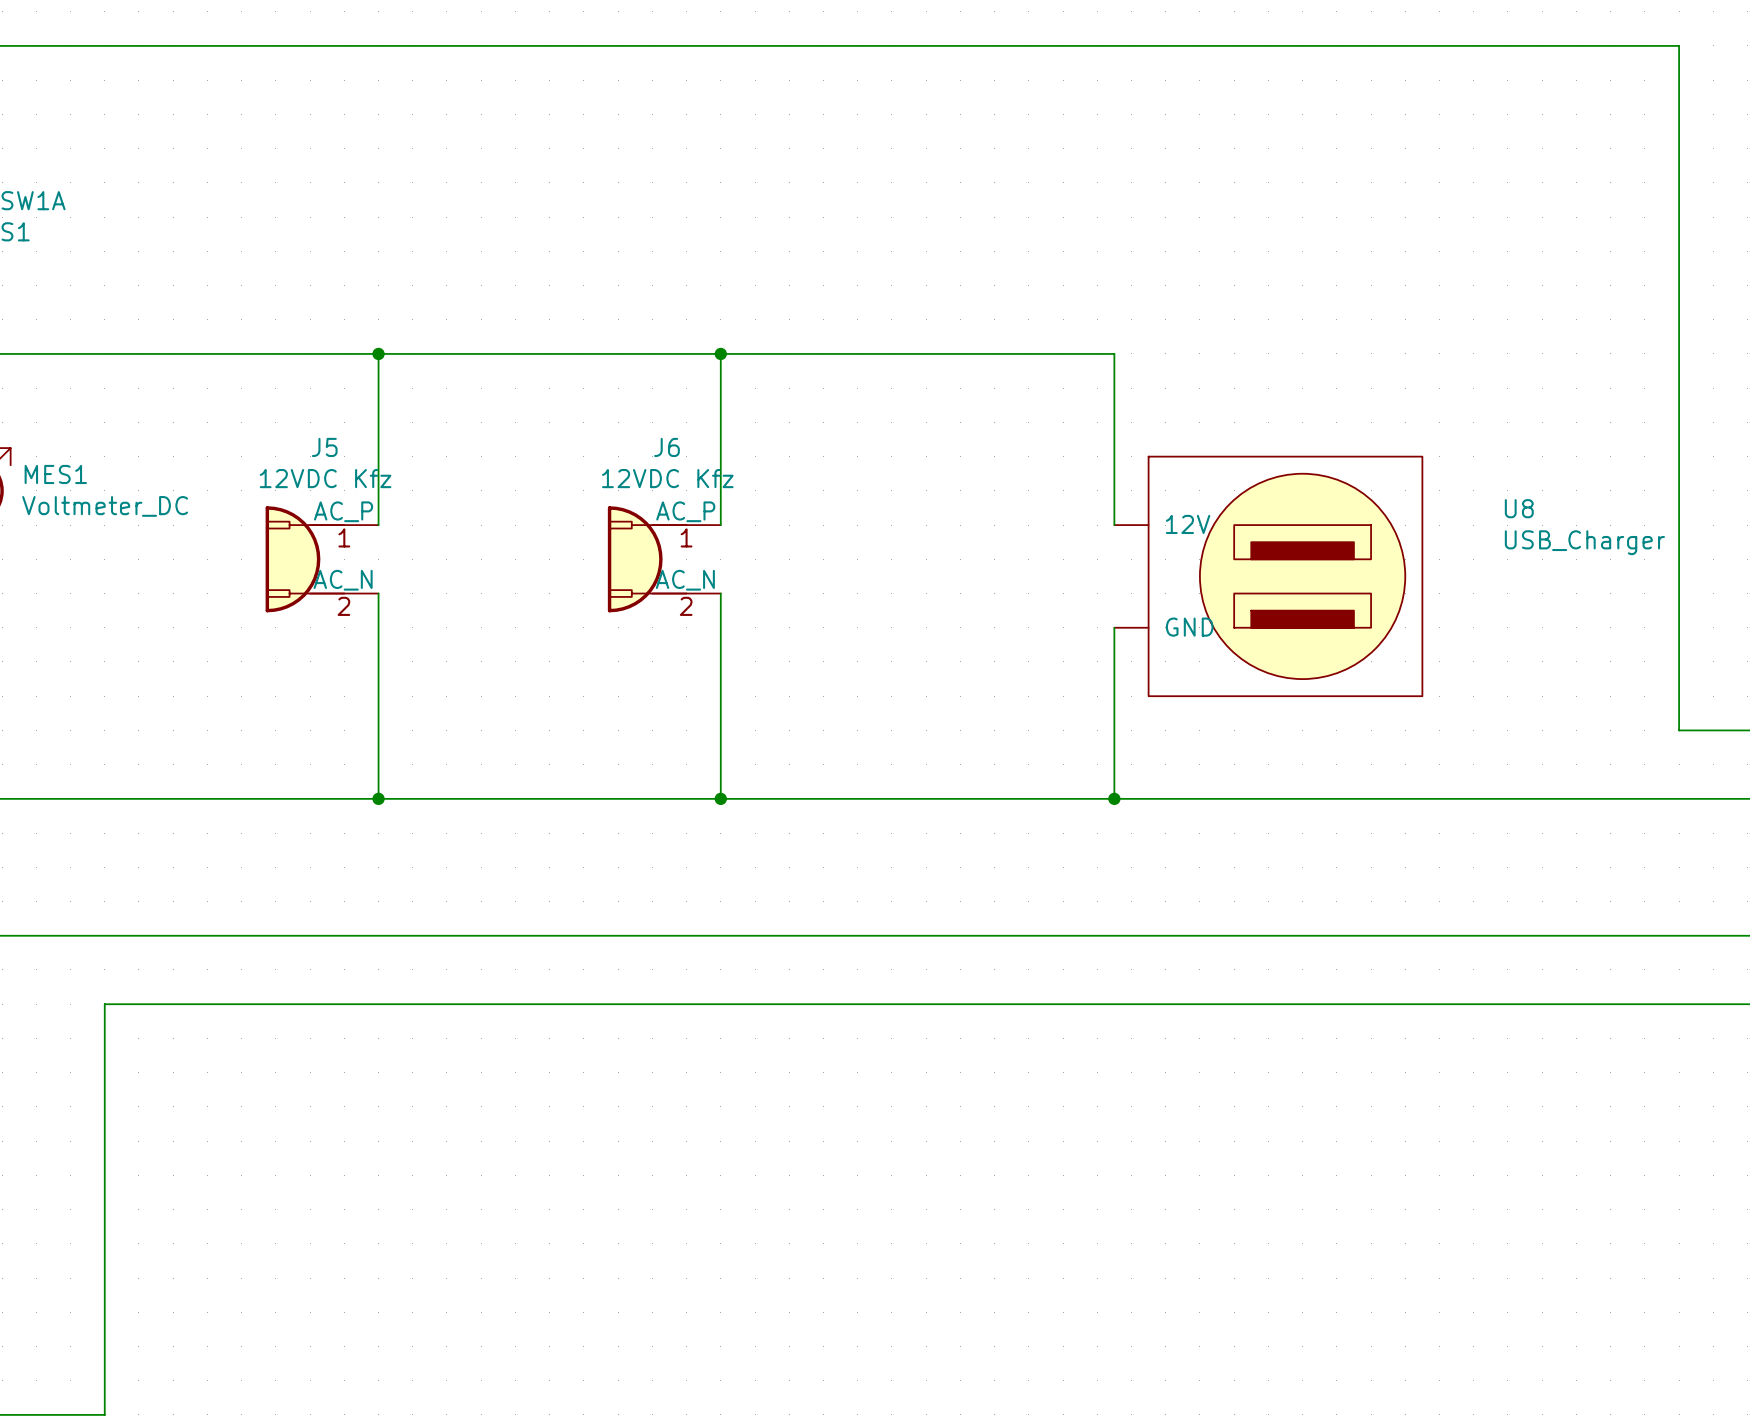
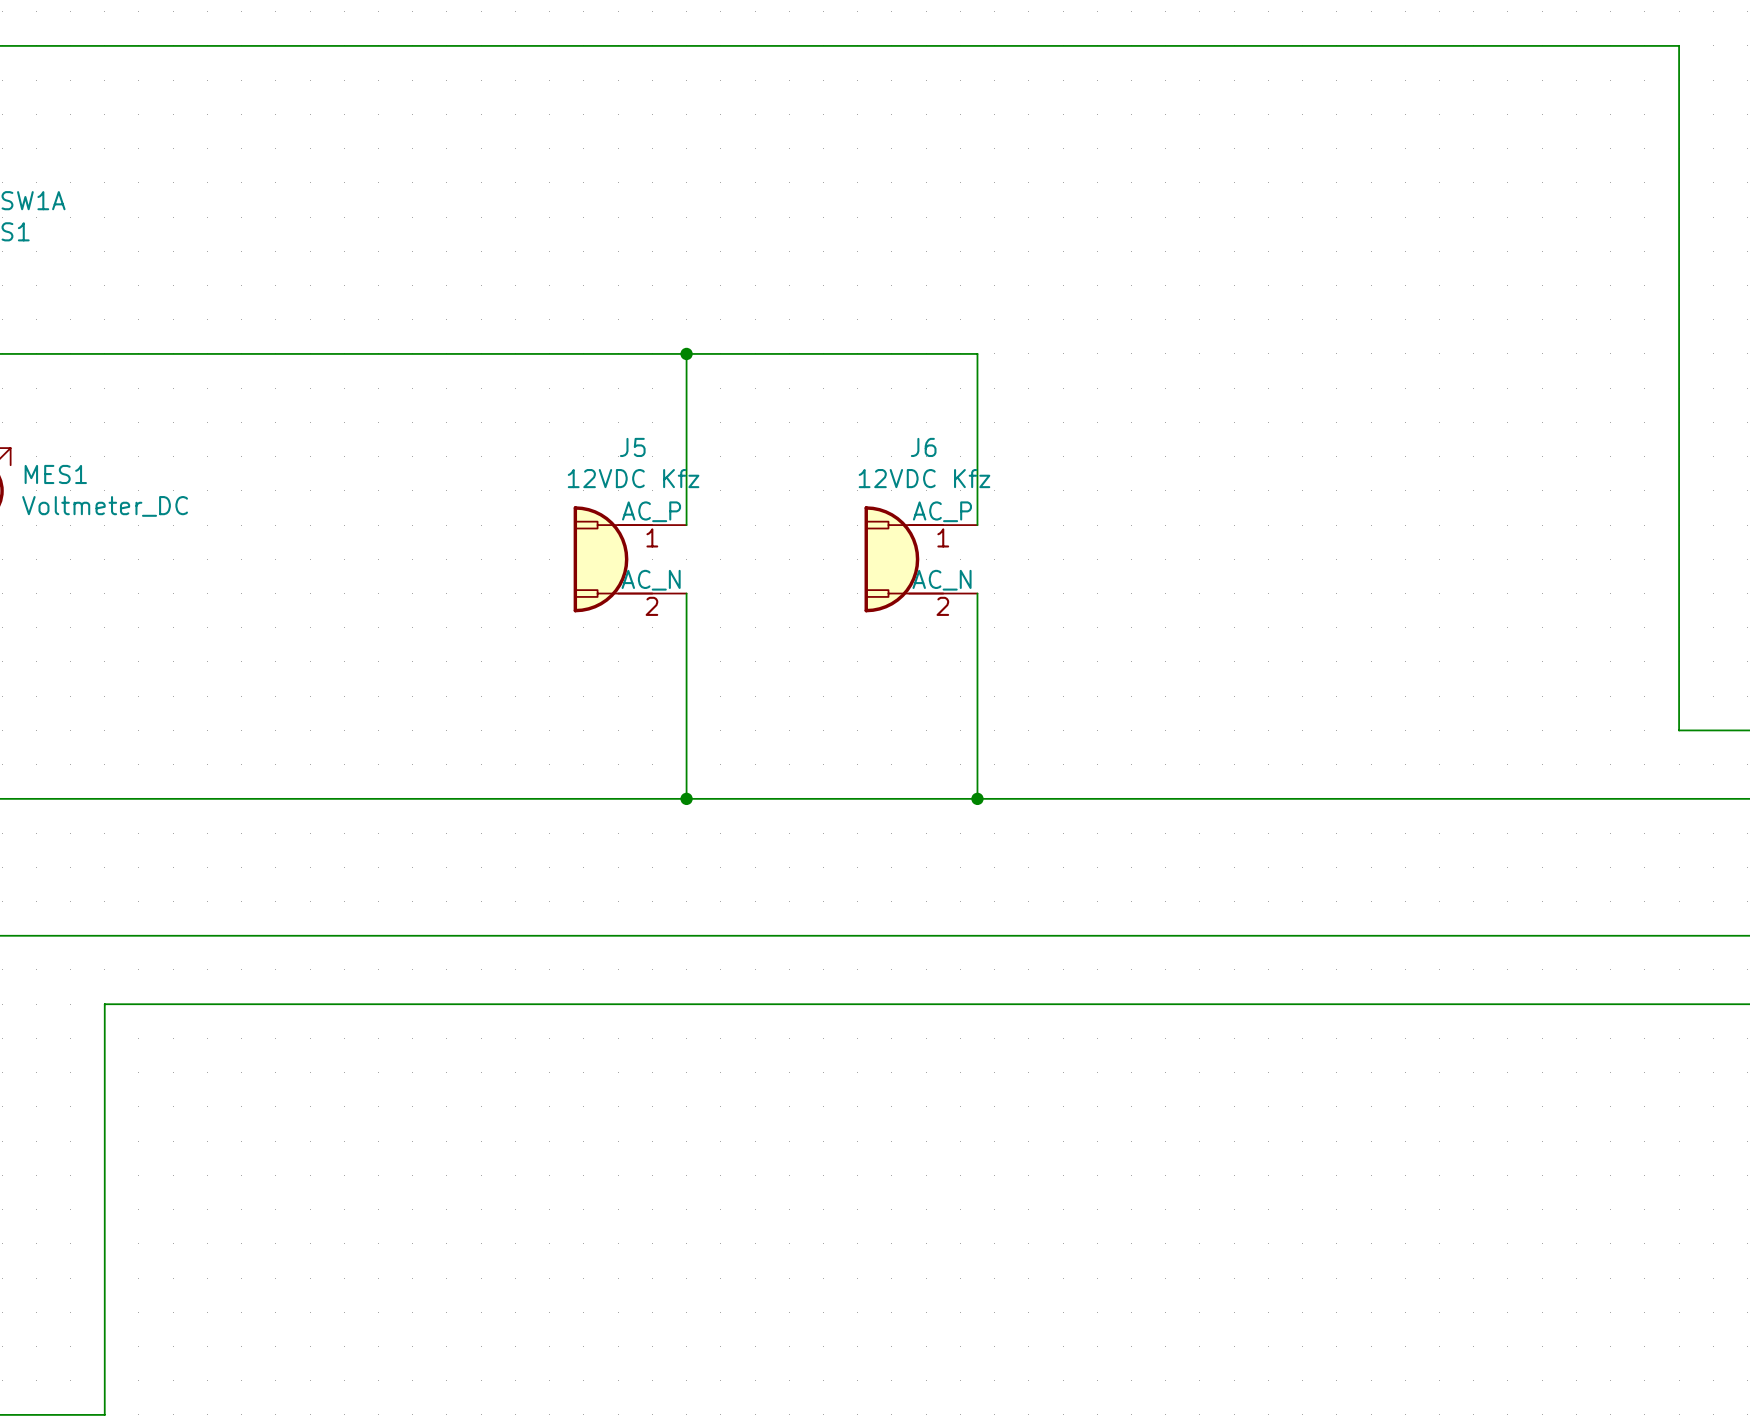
wire: (378, 353) (378, 525) -> none
junction: (378, 353) -> none
wire: (720, 353) (720, 525) -> (686, 353) (686, 525)
junction position: (720, 353) -> (686, 353)
wire: (977, 353) (1114, 353) (1114, 525) -> (977, 353) (977, 525)
J5 position: (322, 559) -> (630, 559)
J6 position: (664, 559) -> (921, 559)
U8: USB_Charger (1268, 576) -> none
wire: (378, 593) (378, 798) -> none
wire: (720, 593) (720, 798) -> (686, 593) (686, 798)
wire: none -> (977, 593) (977, 798)
wire: (1114, 627) (1114, 798) -> none
junction: (378, 798) -> none
junction position: (720, 798) -> (686, 798)
junction: none -> (977, 798)
junction: (1114, 798) -> none

